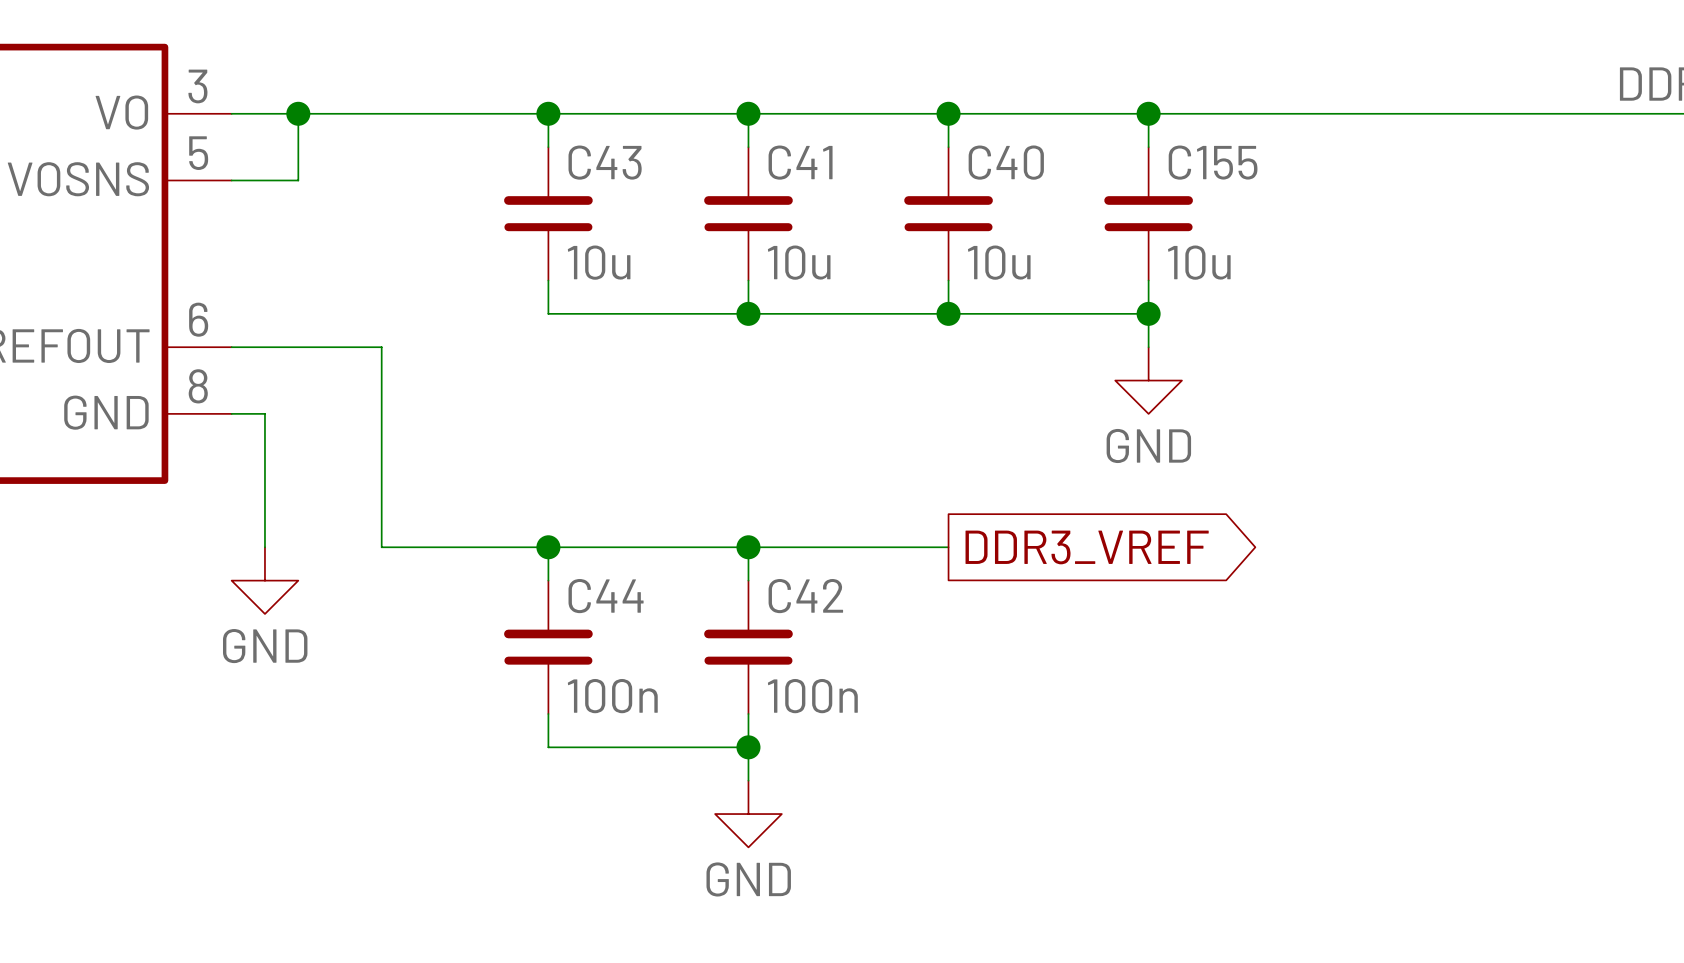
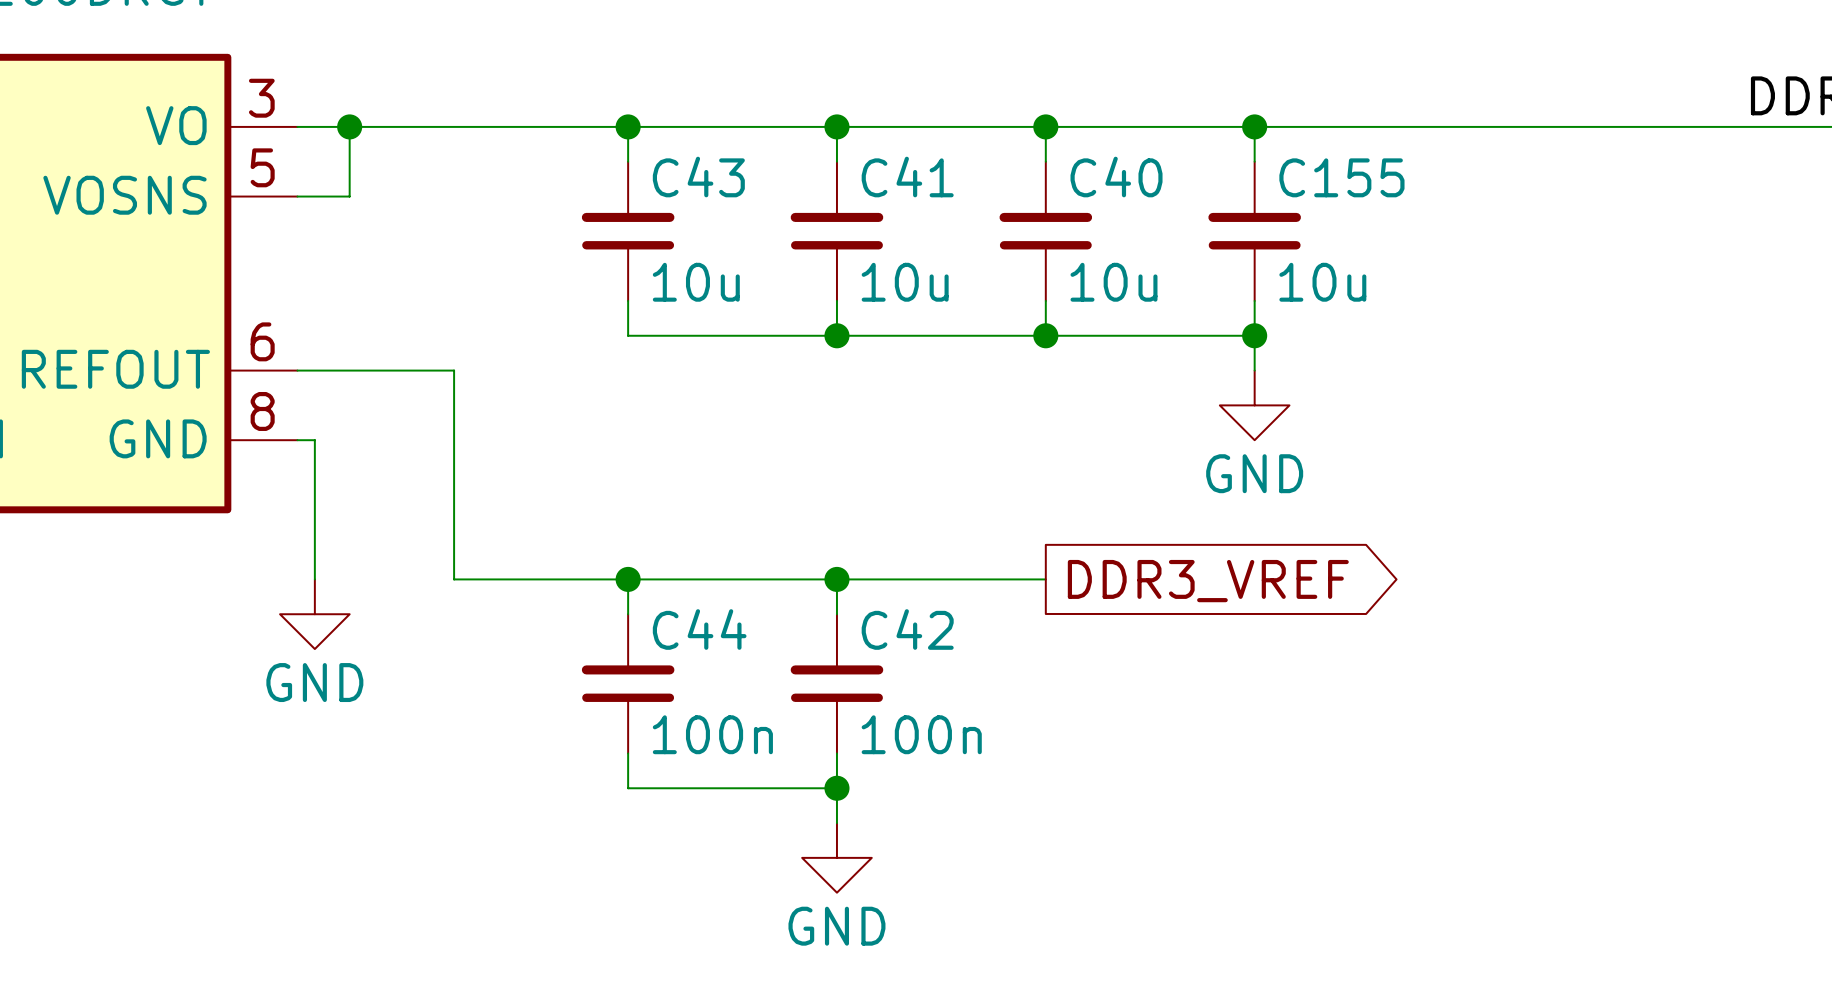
wire: (298, 113) (298, 180) (281, 180) -> (349, 126) (349, 196)
junction position: (298, 113) -> (349, 126)
wire: (248, 413) (264, 413) (264, 547) -> (314, 440) (314, 579)
power symbol position: GND (264, 580) -> GND (314, 614)

